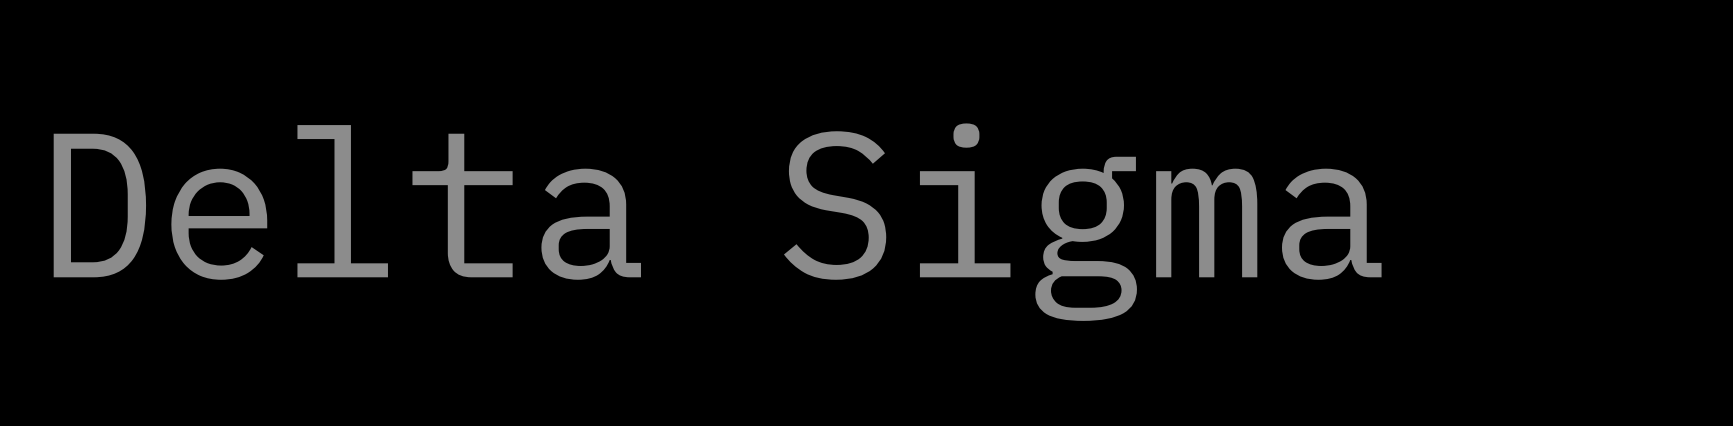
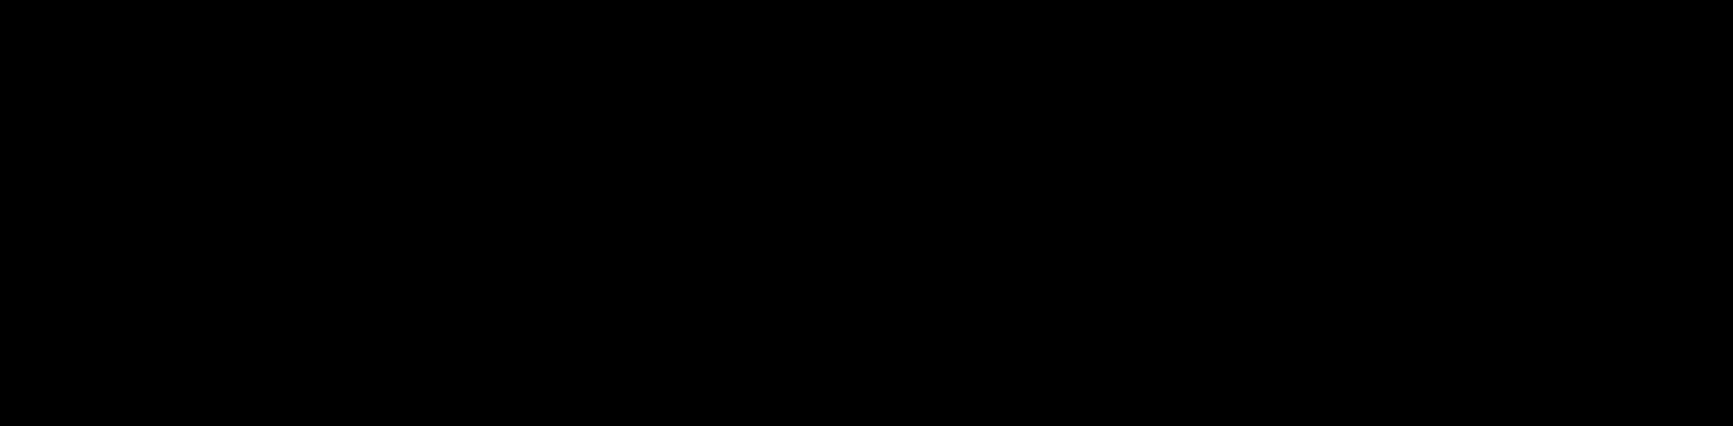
text: Delta Sigma (717, 222) -> none

